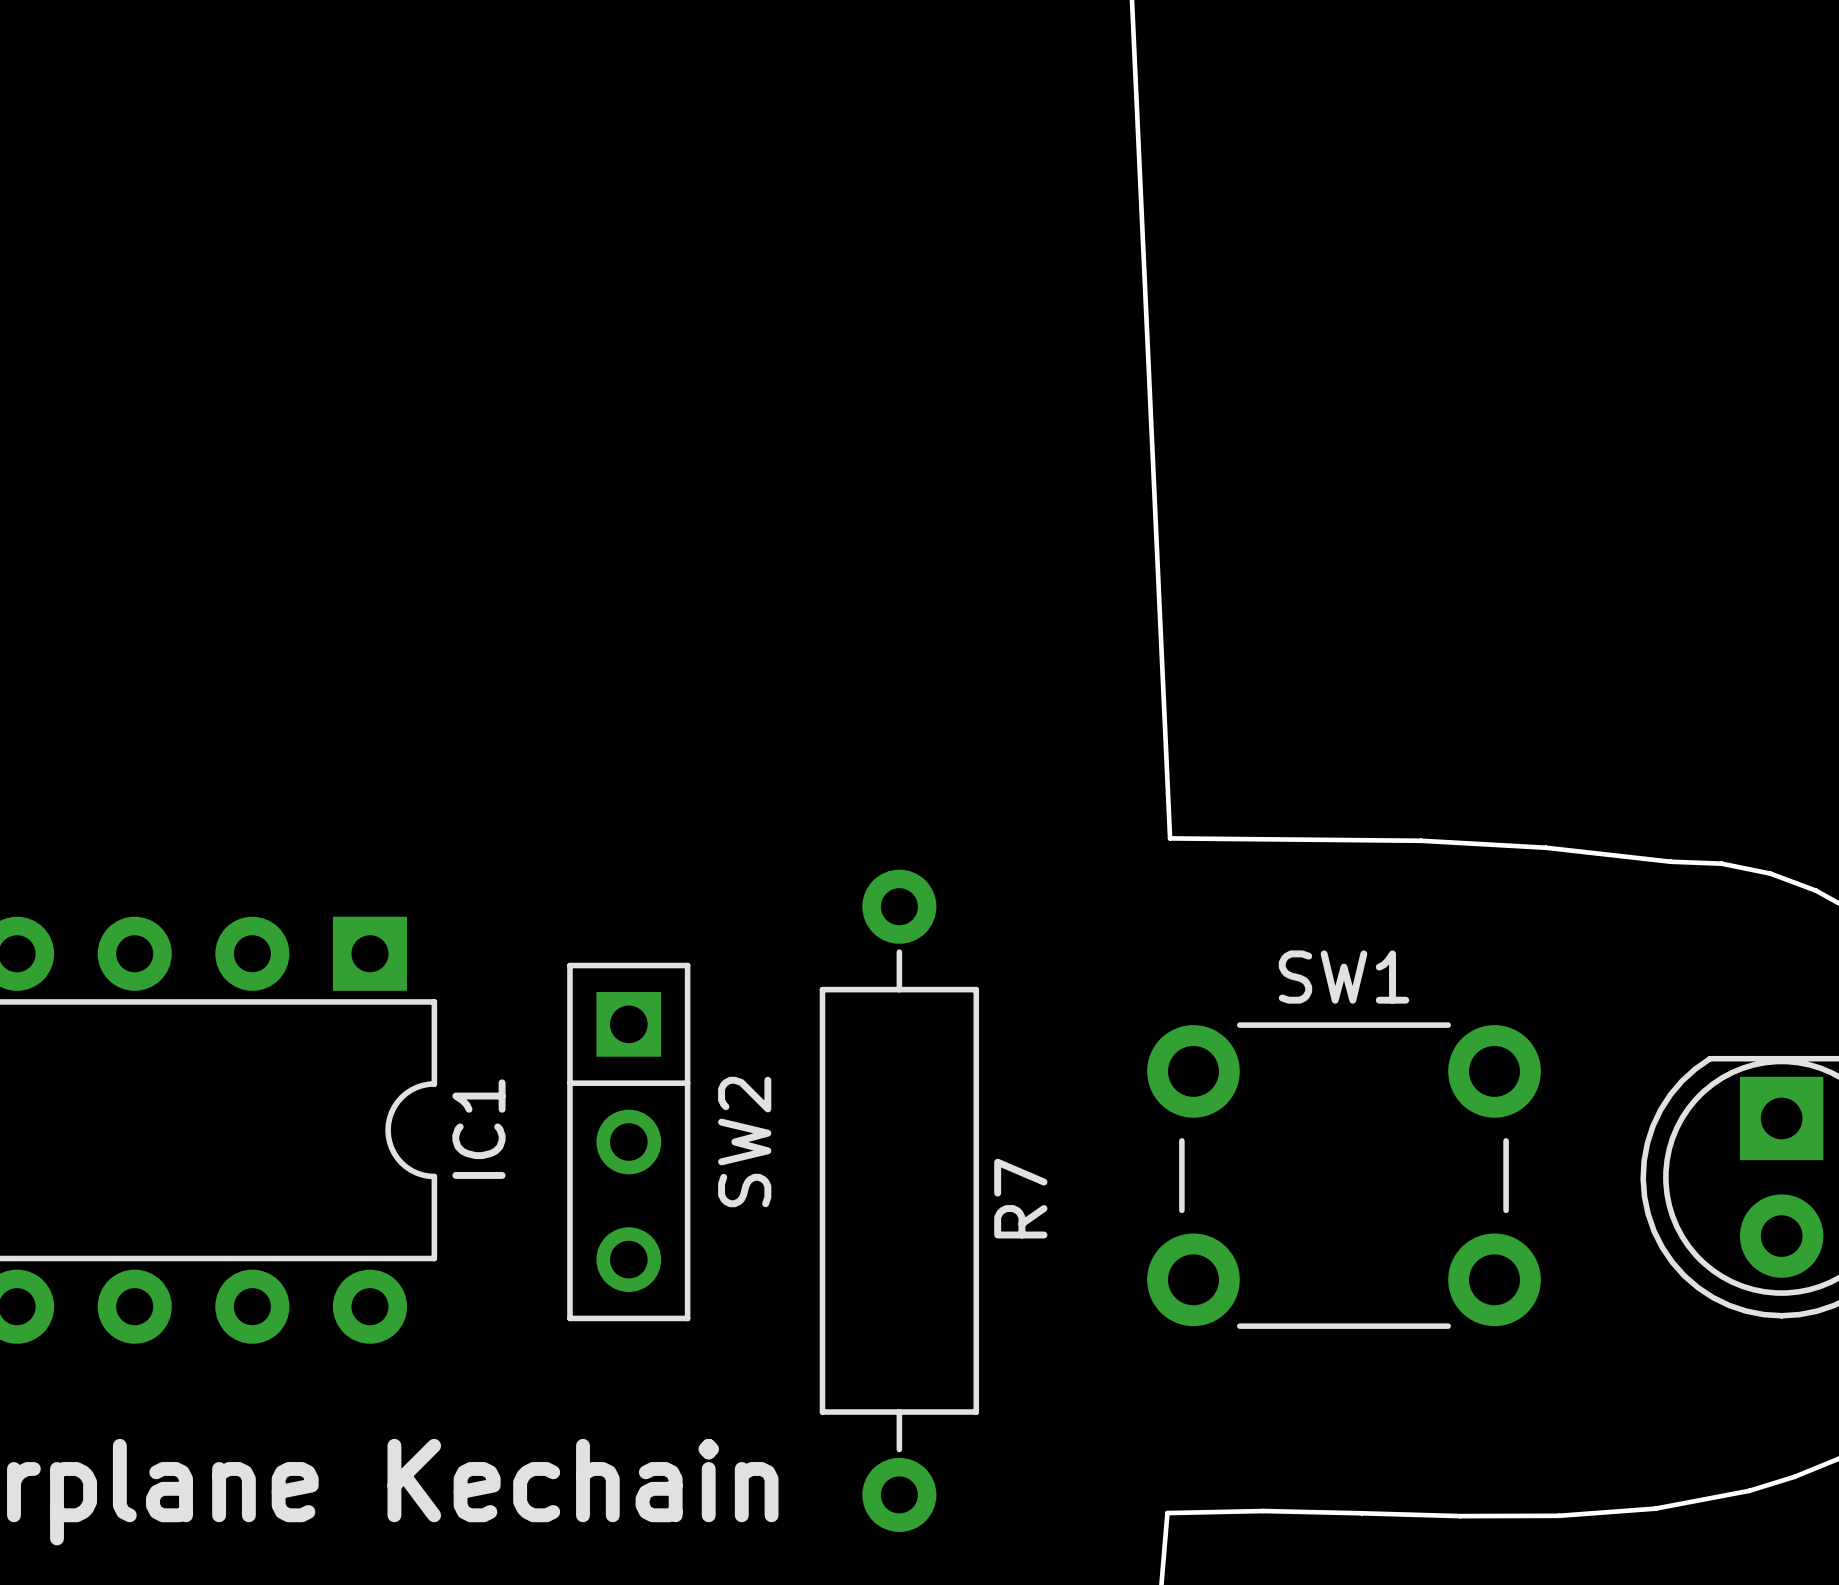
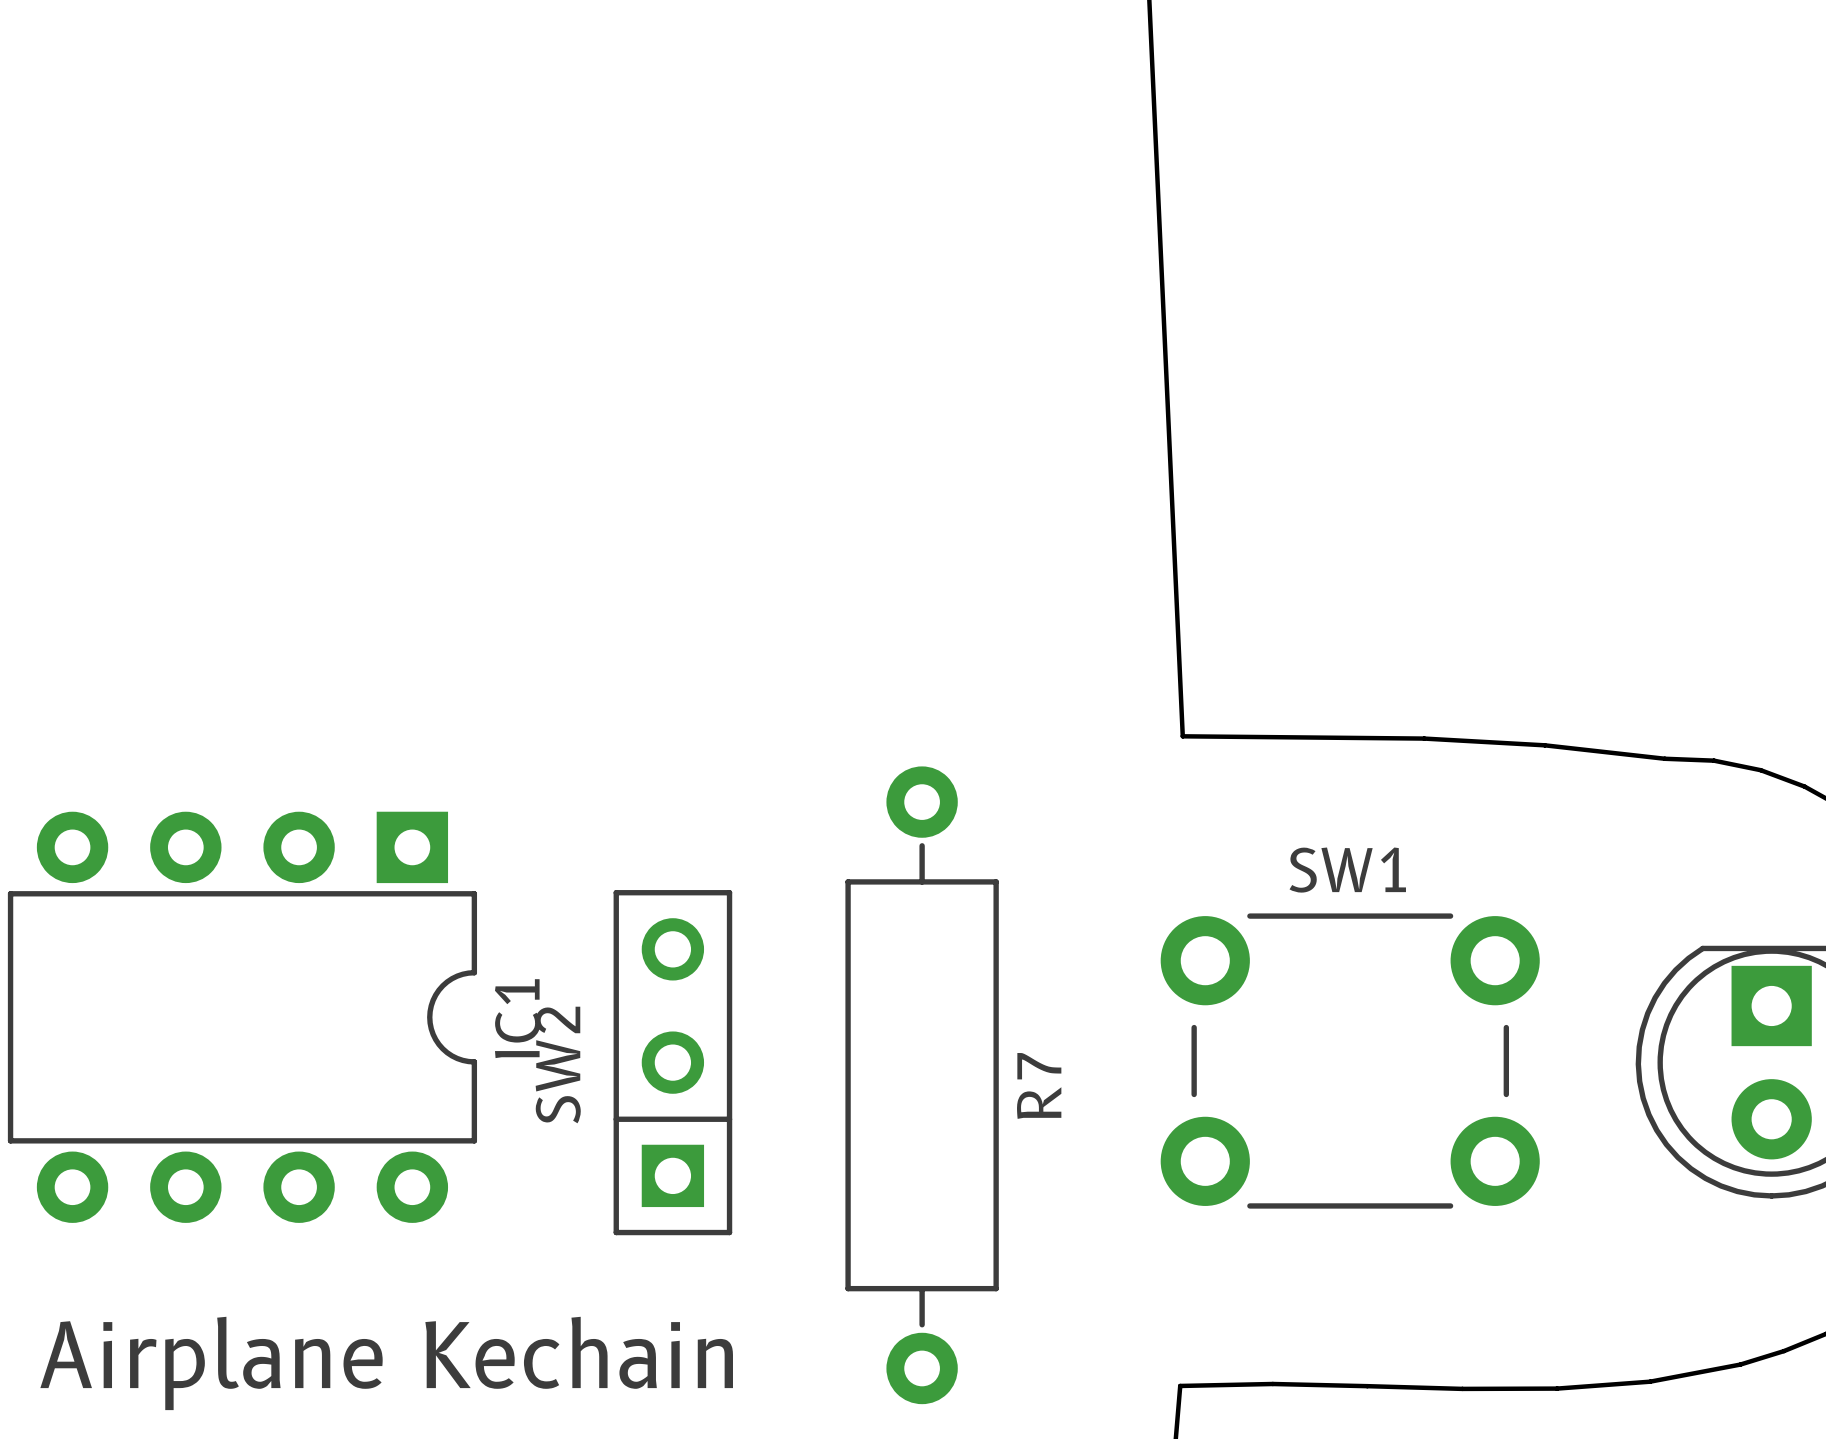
SW2 rotation: 0° (628, 1142) -> 180° (672, 1062)

